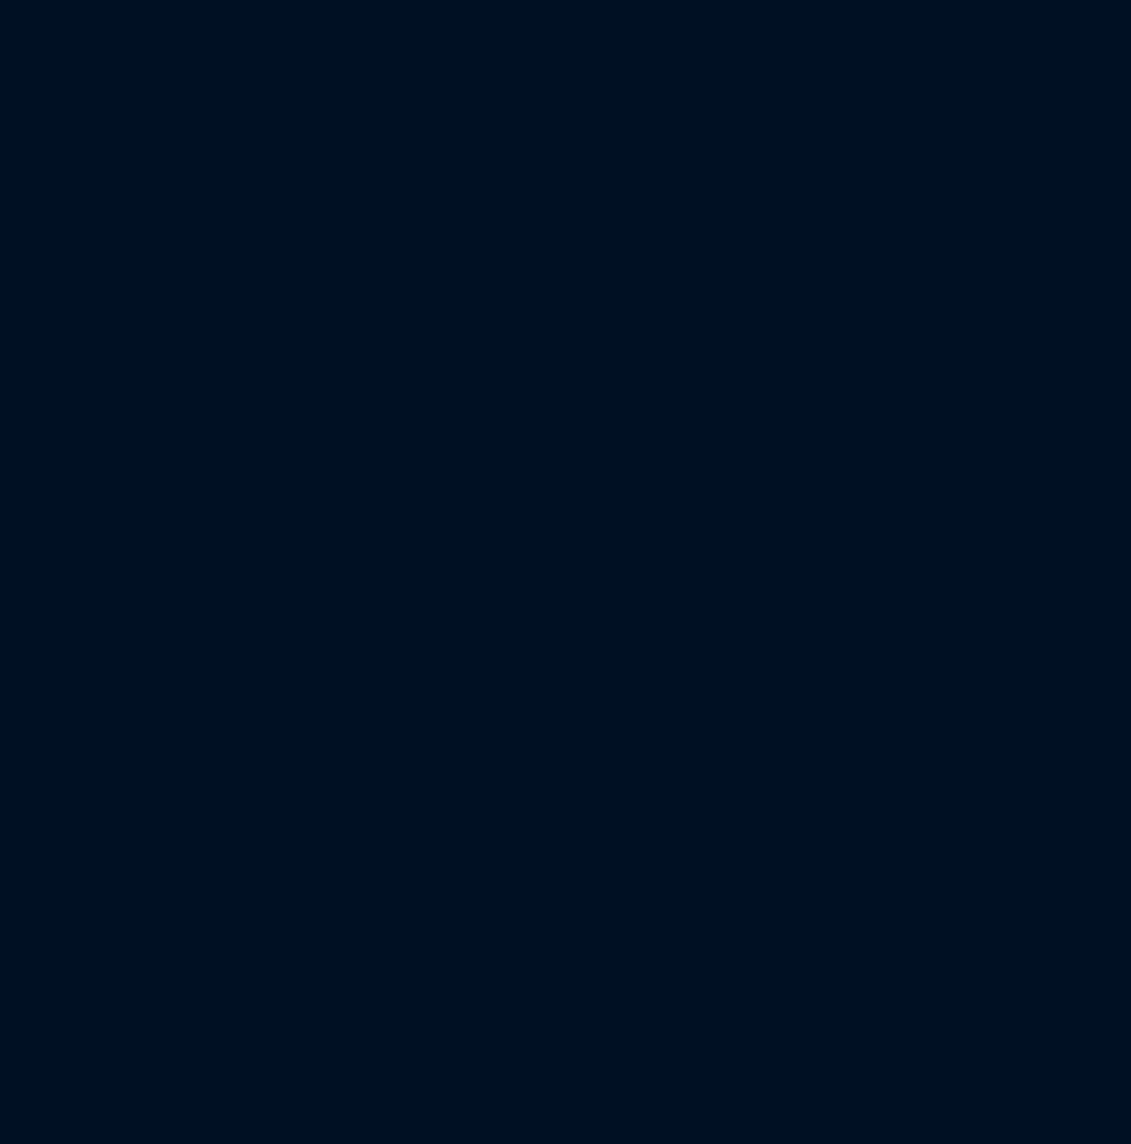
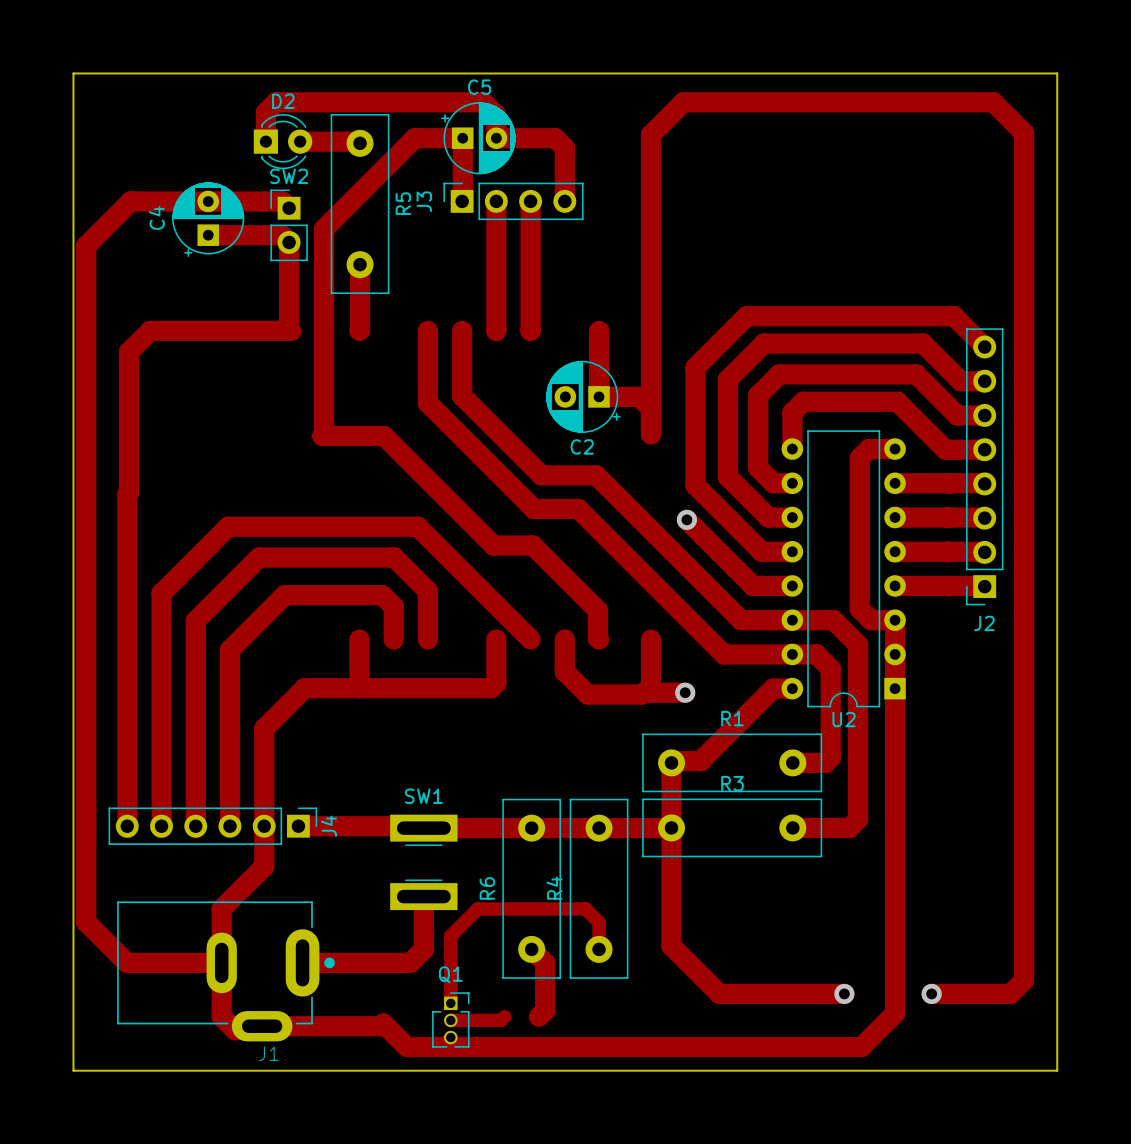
board edge: none -> (73, 73) (73, 1070) (1057, 1070) (1057, 73) (73, 73)
C5: none -> (478, 138)
track: none -> (265, 141) (265, 112) (276, 102) (483, 102) (496, 115) (496, 138) (555, 138) (564, 147) (564, 201)
D2: none -> (283, 141)
track: none -> (300, 141) (358, 141) (360, 143)
track: none -> (462, 201) (462, 138) (414, 138) (324, 228) (324, 434) (322, 436) (384, 436) (493, 545) (532, 545) (597, 610) (599, 639)
track: none -> (496, 201) (496, 330)
J3: none -> (513, 201)
track: none -> (530, 201) (530, 330)
R5: none -> (360, 203)
track: none -> (289, 208) (282, 201) (130, 201) (86, 246) (86, 922) (127, 962) (221, 962)
C4: none -> (208, 219)
SW2: none -> (289, 225)
track: none -> (208, 235) (281, 235) (289, 242) (289, 328) (290, 330) (150, 330) (128, 352) (127, 828)
track: none -> (360, 264) (359, 330)
track: none -> (427, 330) (427, 403) (533, 508) (578, 508) (723, 654) (816, 654) (830, 668) (830, 757) (825, 762) (792, 762)
track: none -> (462, 330) (462, 396) (541, 475) (596, 475) (741, 620) (833, 620) (858, 644) (858, 819) (849, 827) (792, 827)
track: none -> (599, 330) (599, 396) (639, 396) (650, 408)
track: none -> (984, 347) (953, 316) (746, 316) (695, 367) (695, 485) (761, 551) (792, 551)
track: none -> (984, 381) (960, 381) (923, 343) (763, 343) (728, 379) (728, 477) (768, 517) (792, 517)
C2: none -> (583, 396)
track: none -> (984, 415) (957, 415) (916, 374) (779, 374) (758, 395) (758, 467) (773, 483) (792, 483)
track: none -> (650, 434) (650, 134) (683, 102) (993, 102) (1024, 133) (1024, 980) (1010, 993) (931, 993)
track: none -> (792, 449) (792, 412) (803, 401) (897, 401) (945, 449) (984, 449)
track: none -> (895, 449) (868, 449) (859, 458) (859, 608) (871, 620) (895, 620) (895, 1013) (861, 1046) (406, 1046) (383, 1023)
J2: none -> (984, 466)
track: none -> (895, 483) (984, 483)
track: none -> (895, 517) (984, 518)
track: none -> (686, 519) (753, 585) (792, 585)
via: none -> (686, 519)
track: none -> (895, 551) (984, 552)
U2: none -> (843, 568)
track: none -> (895, 585) (984, 586)
track: none -> (359, 639) (359, 688)
track: none -> (393, 639) (393, 606) (382, 595) (284, 595) (229, 649) (229, 826)
track: none -> (427, 639) (427, 591) (394, 557) (259, 557) (195, 620) (195, 828)
track: none -> (496, 639) (496, 683) (491, 688) (304, 688) (264, 728) (264, 866) (221, 908) (221, 1016) (235, 1030) (239, 1026) (380, 1026) (383, 1023)
track: none -> (530, 639) (417, 526) (228, 526) (161, 593) (161, 828)
track: none -> (564, 639) (564, 671) (587, 694) (642, 694) (650, 685)
track: none -> (650, 639) (650, 692) (685, 692)
track: none -> (792, 688) (773, 688) (700, 761) (673, 761) (671, 762) (671, 946) (719, 993) (844, 993)
via: none -> (685, 692)
R1: none -> (732, 762)
J4: none -> (212, 826)
track: none -> (298, 826) (671, 827)
R3: none -> (732, 827)
SW1: none -> (423, 862)
R6: none -> (531, 888)
R4: none -> (599, 888)
track: none -> (423, 896) (423, 949) (410, 962) (302, 962)
track: none -> (531, 949) (545, 962) (545, 1010) (538, 1016)
track: none -> (599, 949) (599, 922) (585, 908) (477, 908) (450, 935) (450, 1003)
J1: none -> (225, 971)
via: none -> (844, 993)
via: none -> (931, 993)
track: none -> (504, 1016) (501, 1020) (450, 1020)
Q1: none -> (450, 1019)

